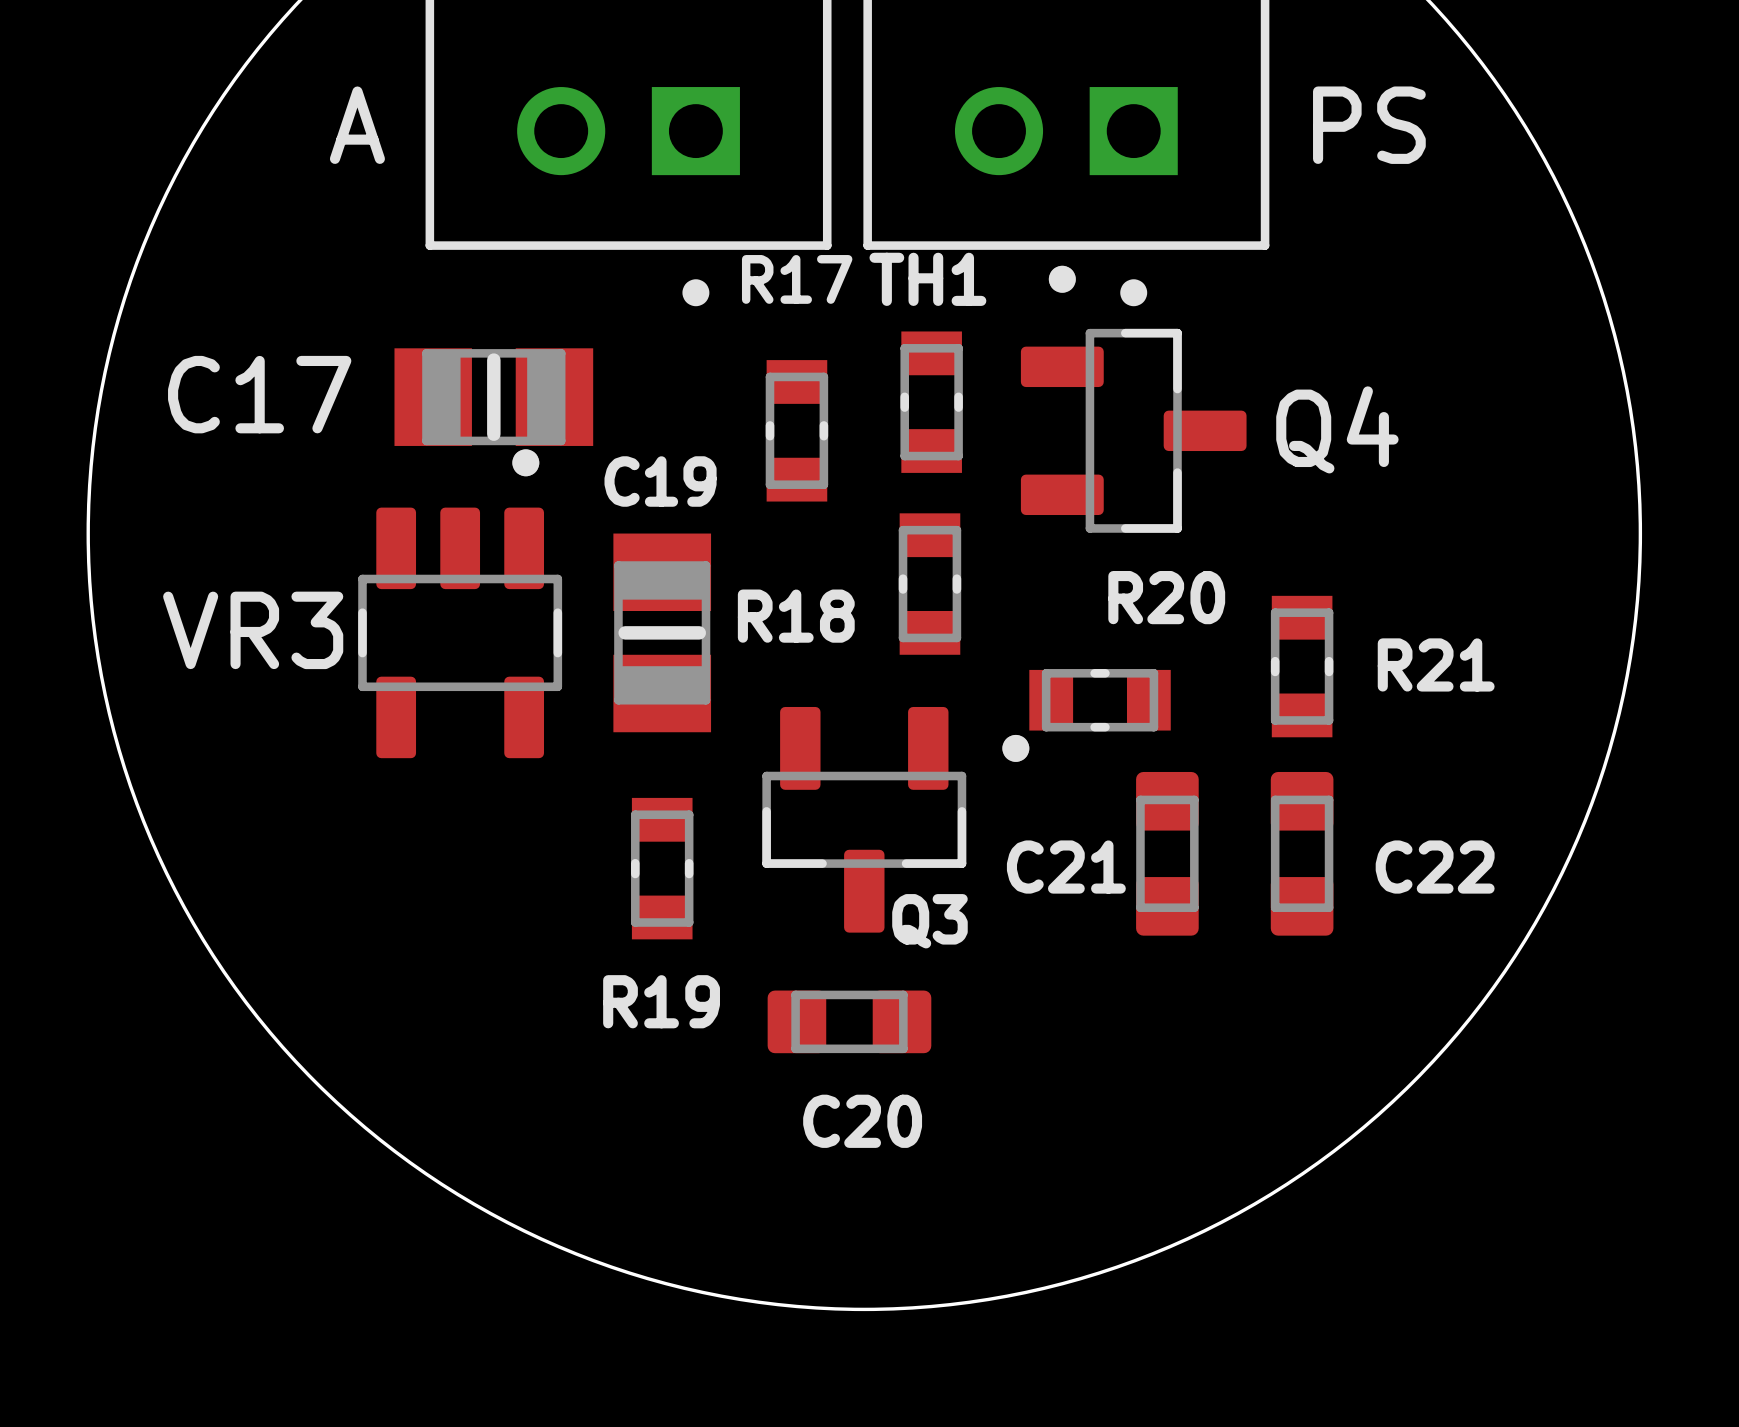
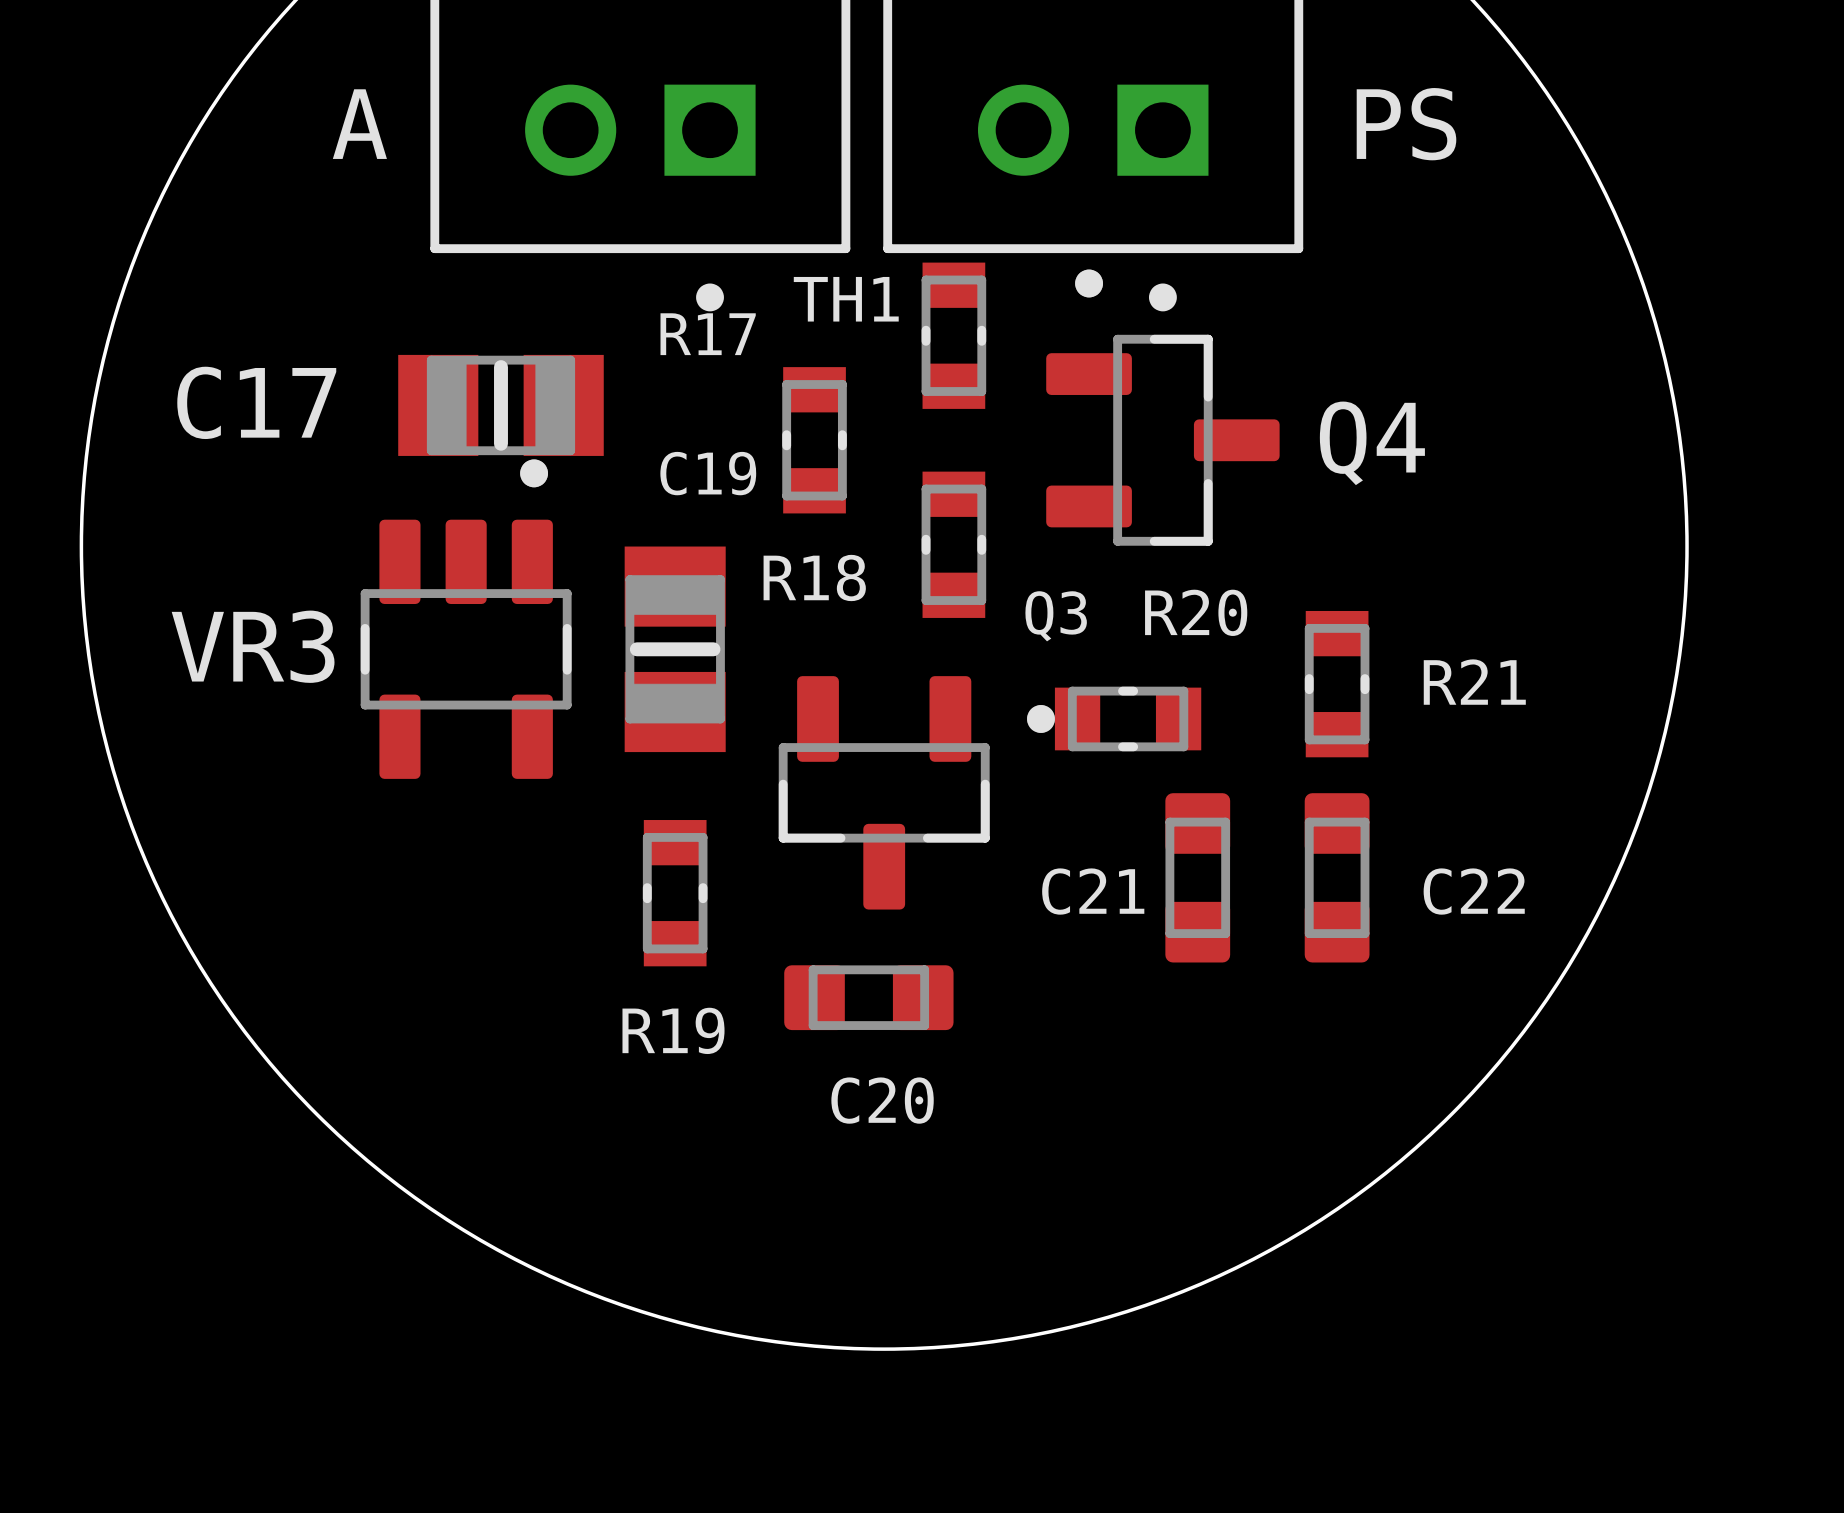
R17 name position: R17 (797, 279) -> R17 (708, 334)
TH1 name position: TH1 (927, 279) -> TH1 (846, 299)
TH1 position: (931, 402) -> (953, 335)
C19 name position: C19 (660, 481) -> C19 (708, 473)
R18 position: (929, 584) -> (953, 544)
Q3 position: (895, 819) -> (916, 792)
Q3 name position: Q3 (929, 921) -> Q3 (1056, 616)
C20 position: (849, 1021) -> (868, 997)

